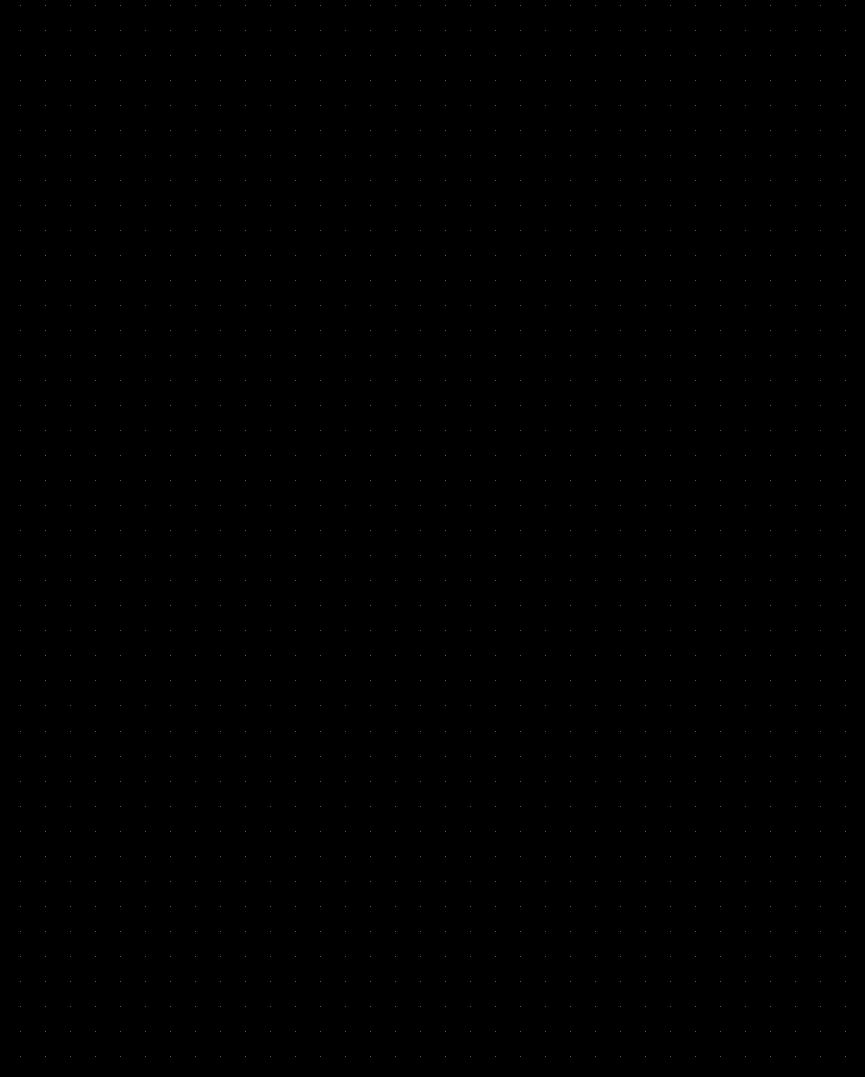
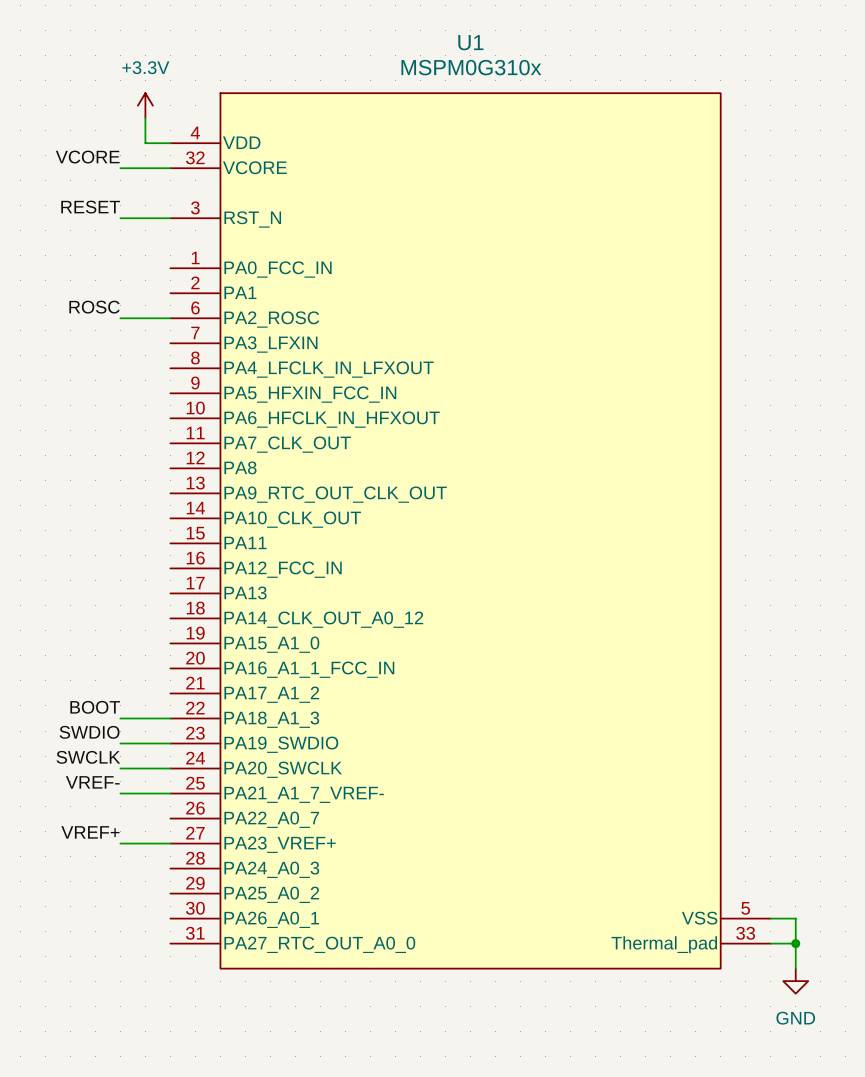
power symbol: none -> +3.3V (145, 105)
wire: none -> (145, 118) (145, 143) (170, 143)
label: none -> VCORE (87, 157)
wire: none -> (120, 168) (170, 168)
label: none -> RESET (90, 207)
wire: none -> (120, 218) (170, 218)
label: none -> ROSC (94, 307)
wire: none -> (120, 318) (170, 318)
U1: none -> MSPM0G310x (470, 530)
label: none -> BOOT (95, 707)
wire: none -> (120, 718) (170, 718)
label: none -> SWDIO (89, 732)
wire: none -> (120, 743) (170, 743)
label: none -> SWCLK (88, 757)
wire: none -> (120, 768) (170, 768)
label: none -> VREF- (92, 782)
wire: none -> (120, 793) (170, 793)
label: none -> VREF+ (90, 832)
wire: none -> (120, 843) (170, 843)
wire: none -> (770, 918) (795, 918) (795, 968)
wire: none -> (770, 943) (795, 943)
junction: none -> (795, 943)
power symbol: none -> GND (795, 981)

